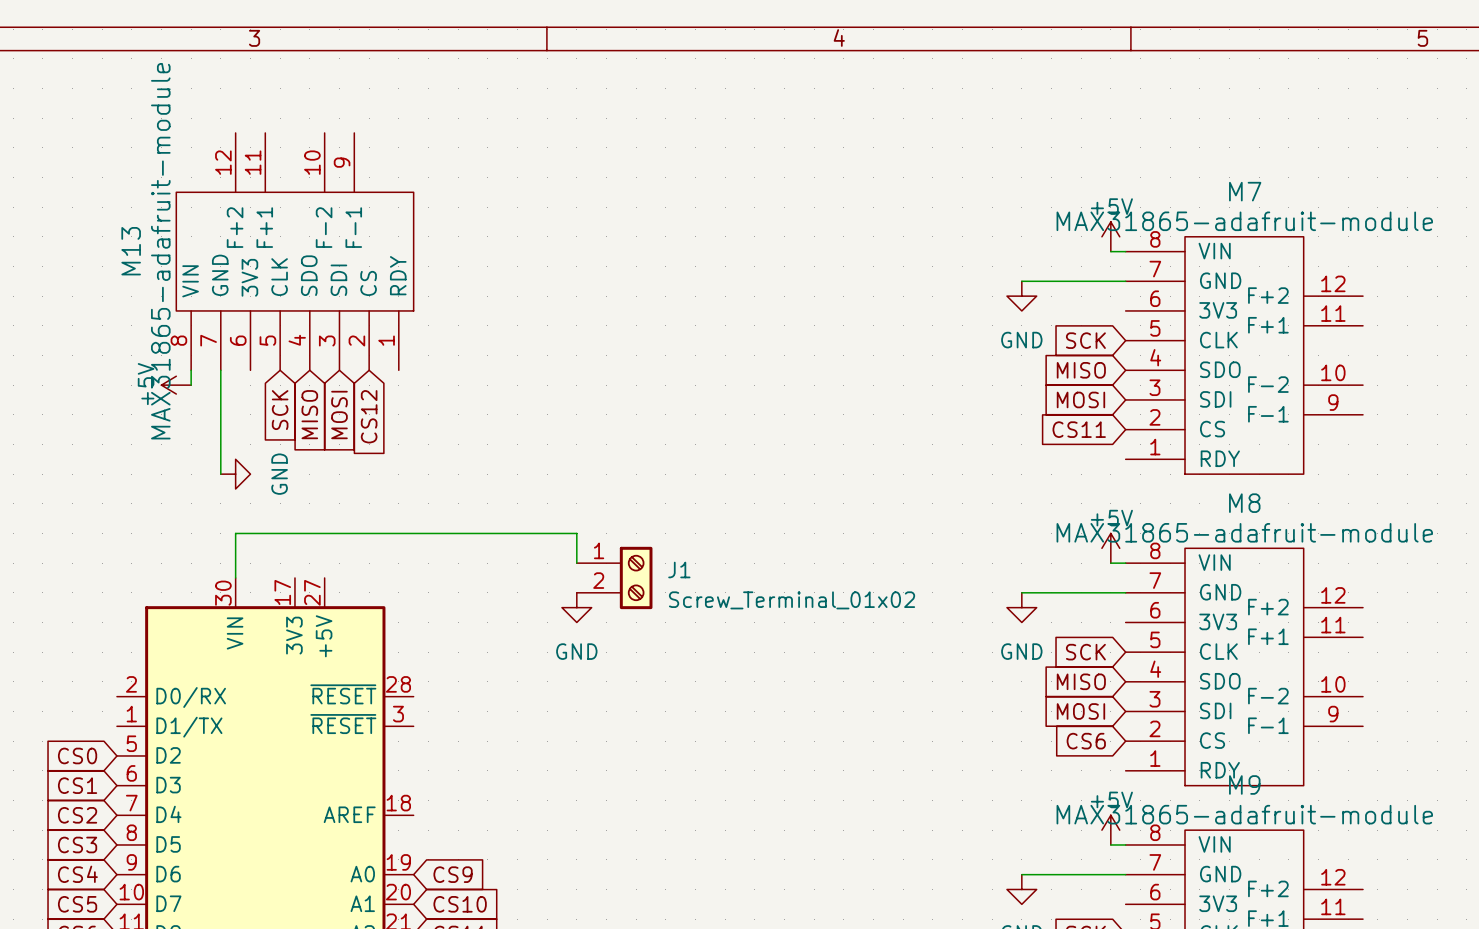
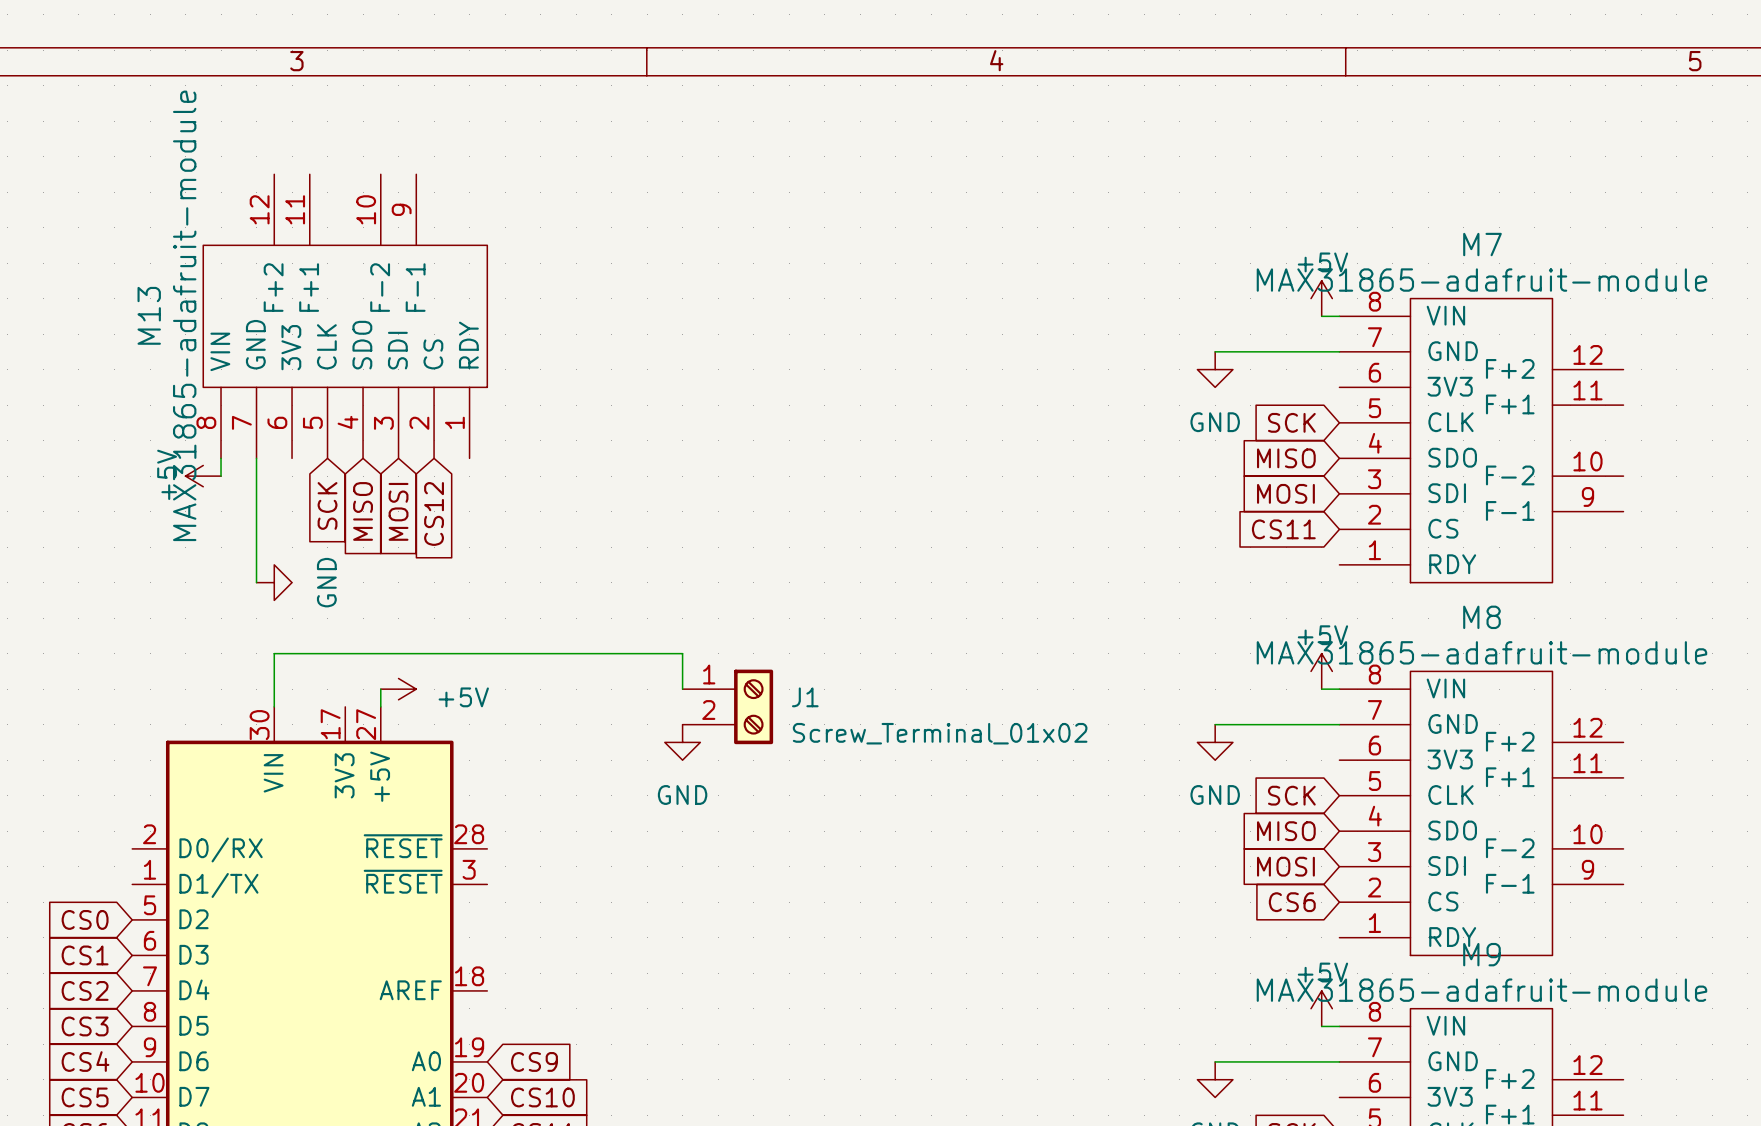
wire: none -> (380, 689) (380, 706)
power symbol: none -> +5V (398, 689)

